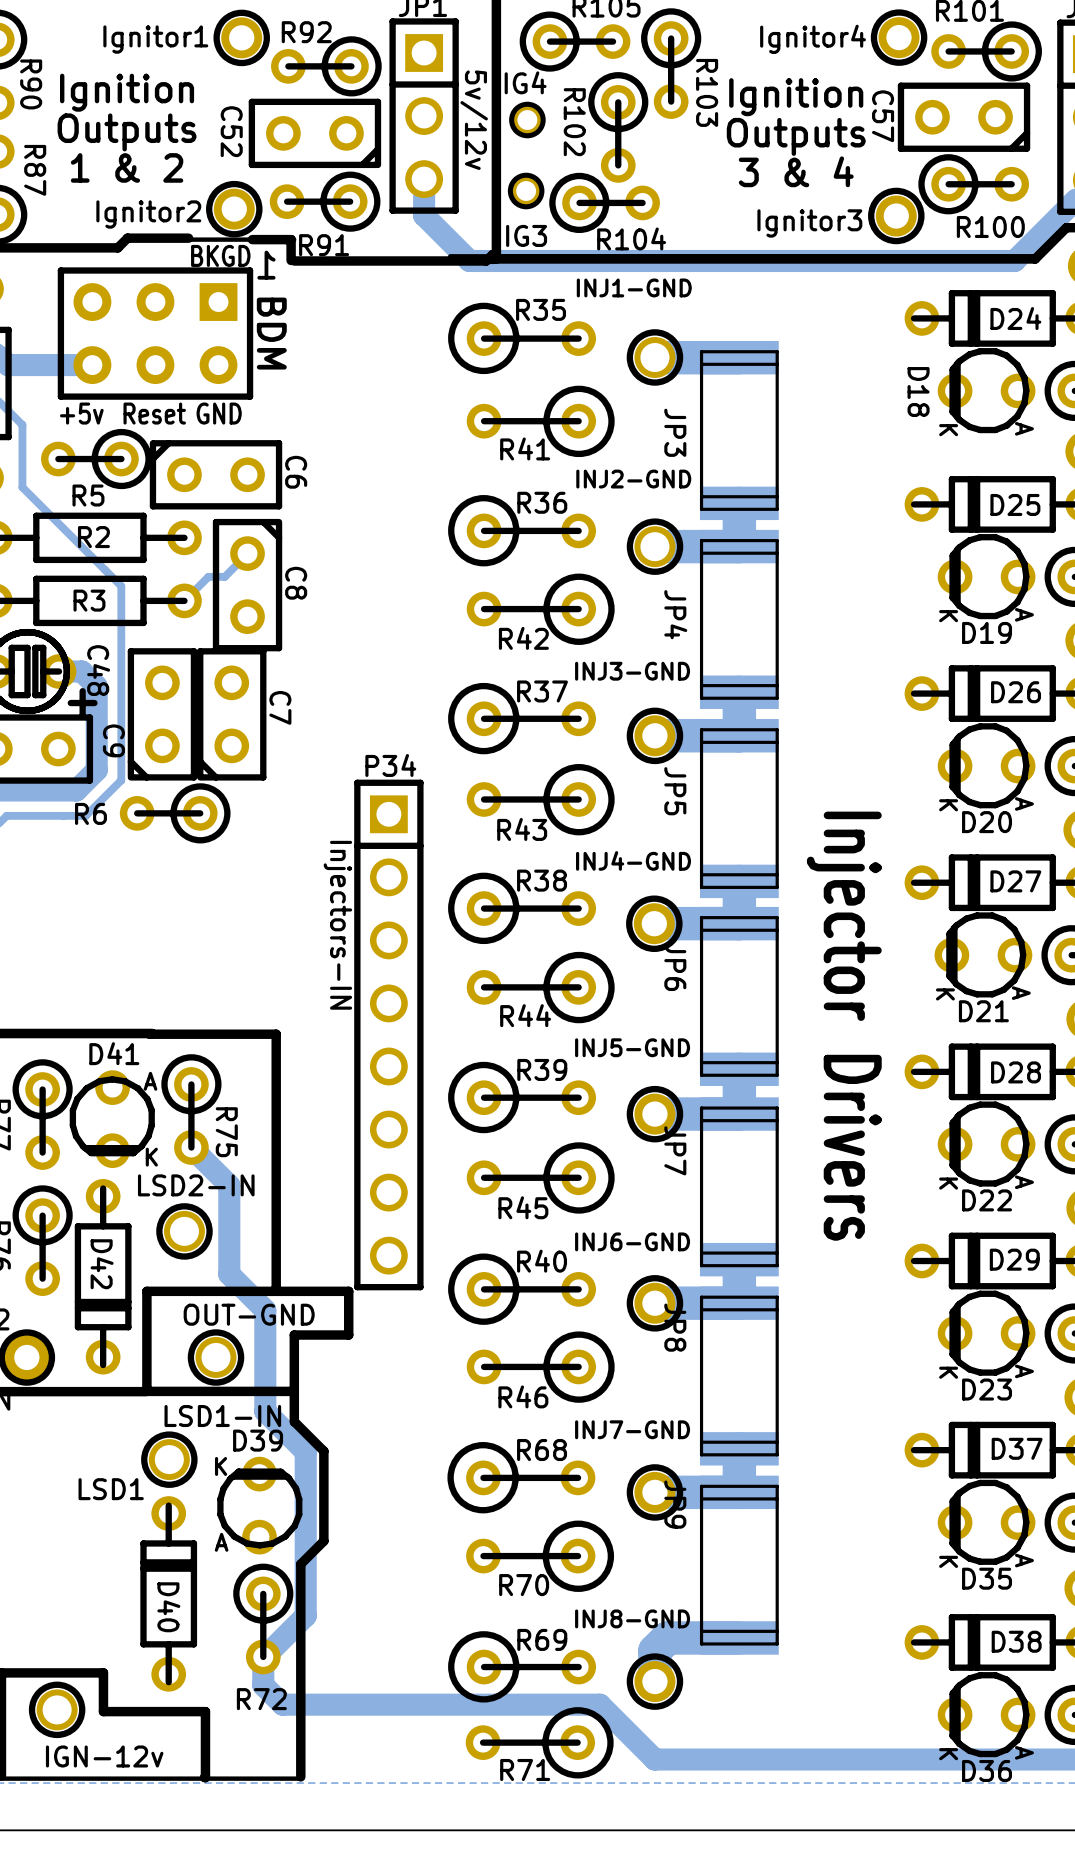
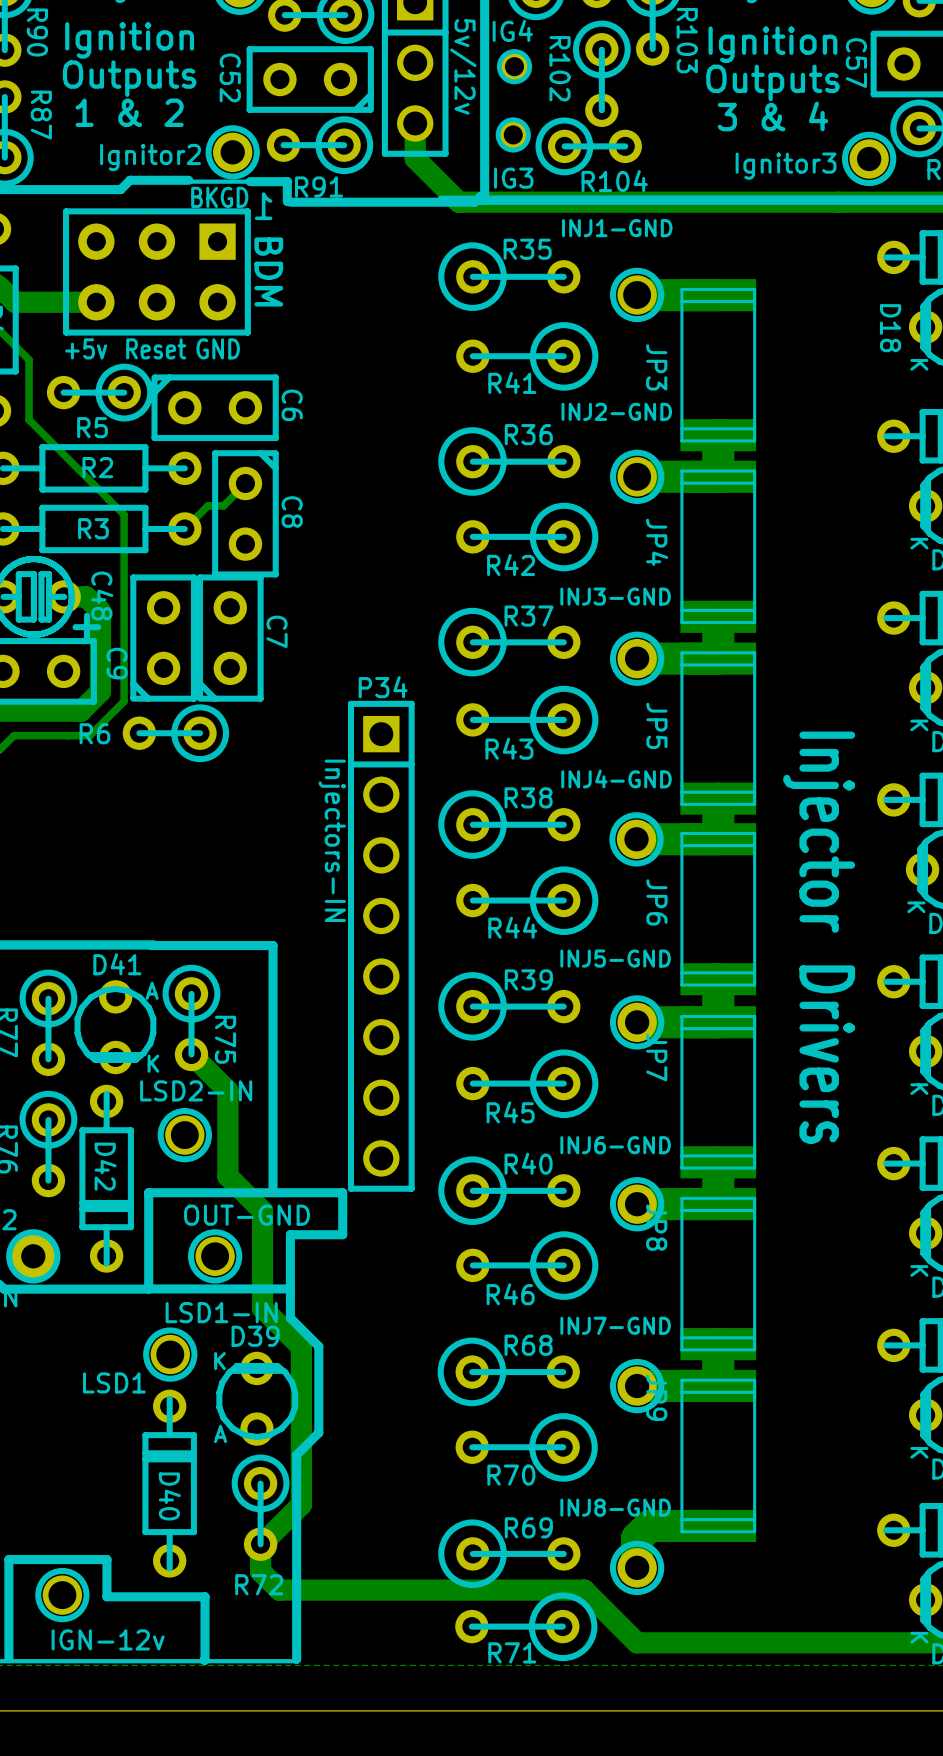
JP5 name position: JP5 (675, 791) -> JP5 (656, 725)
JP6 name position: JP6 (675, 966) -> JP6 (656, 902)

